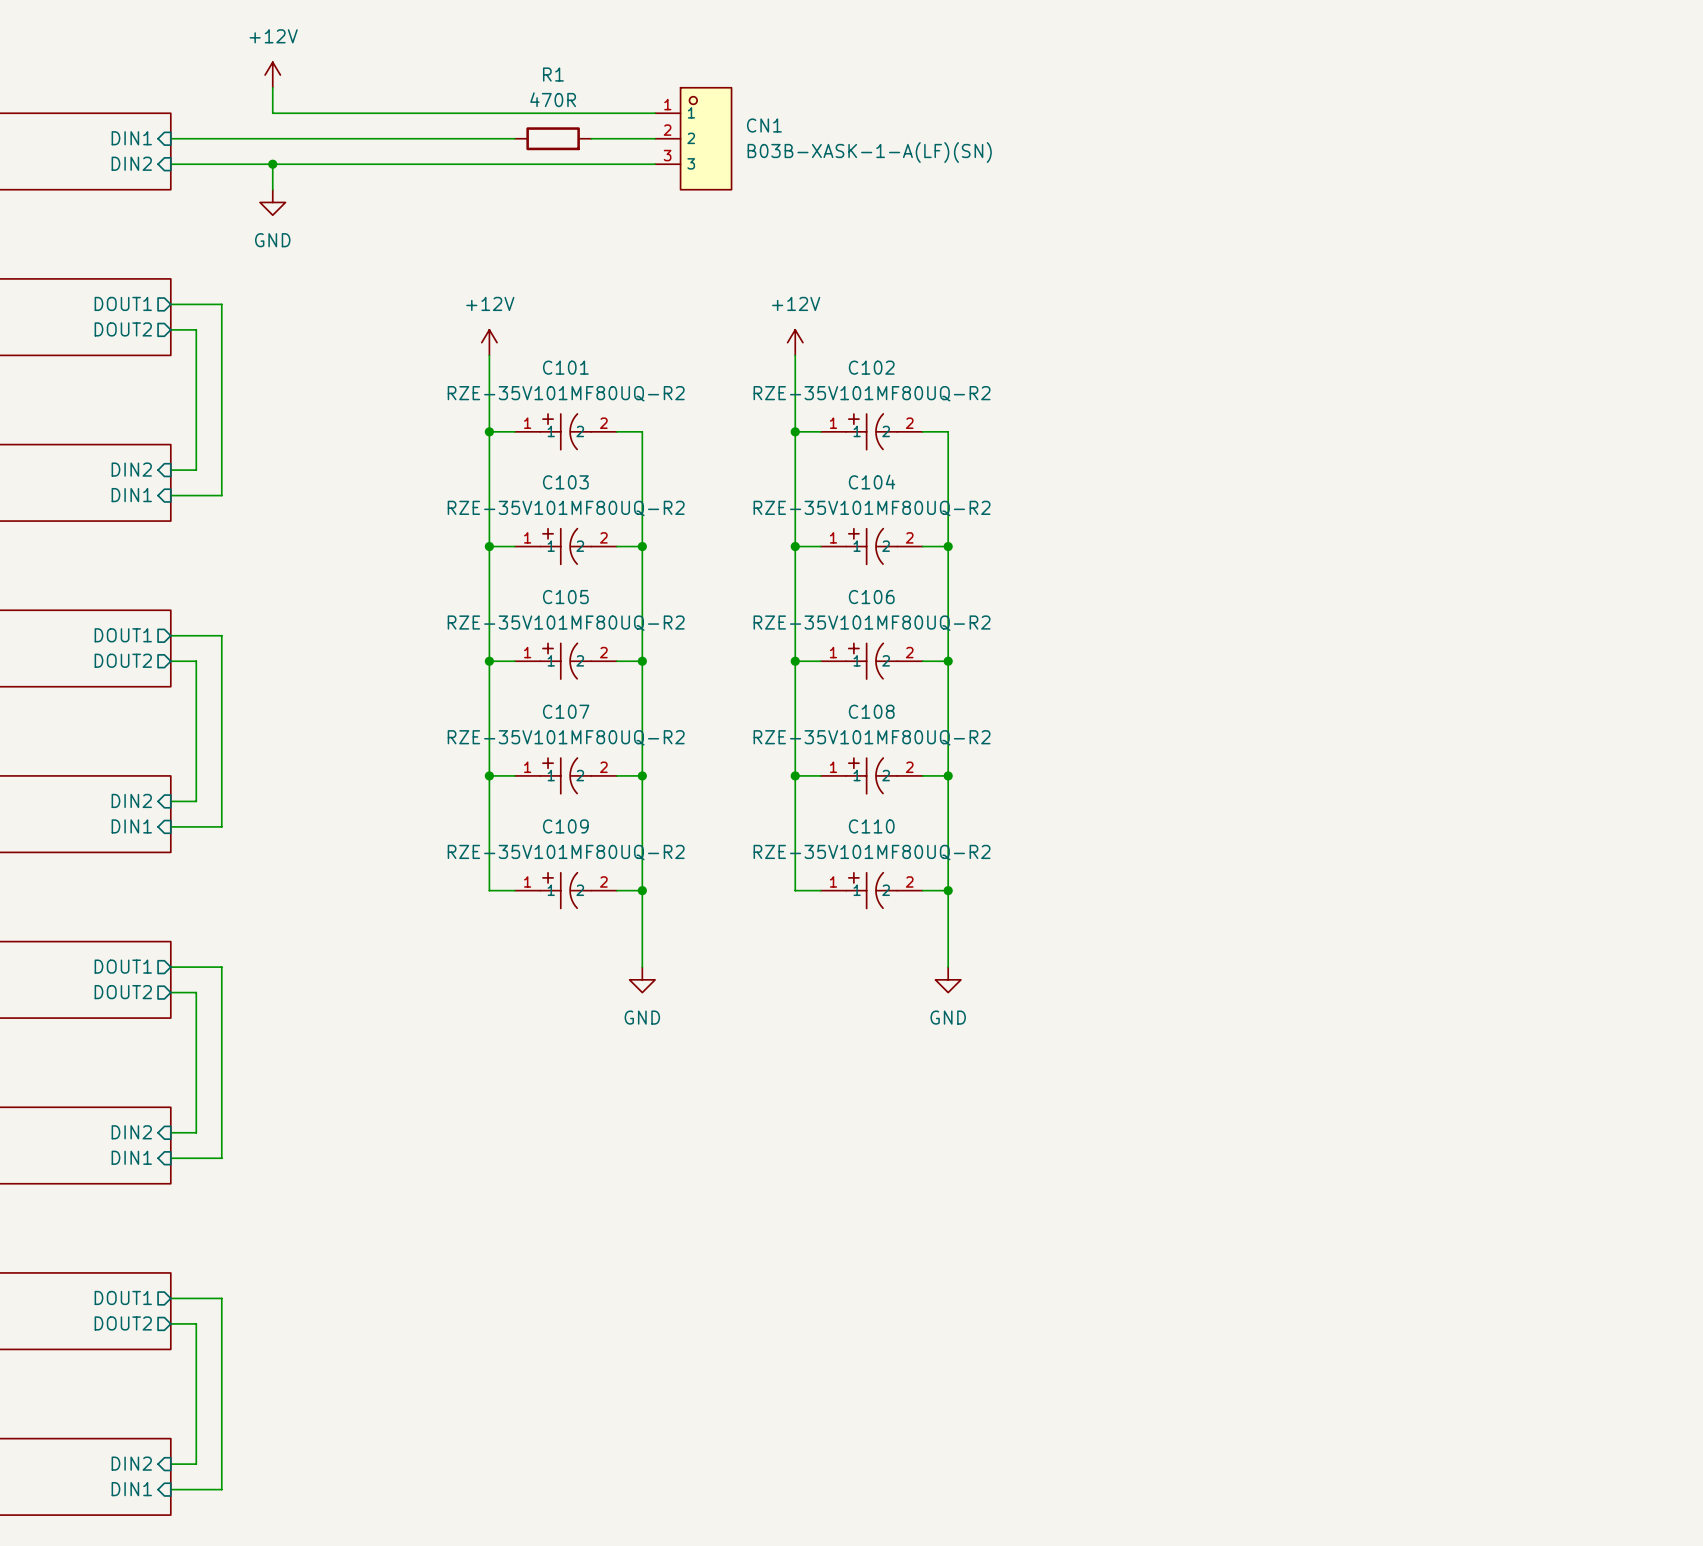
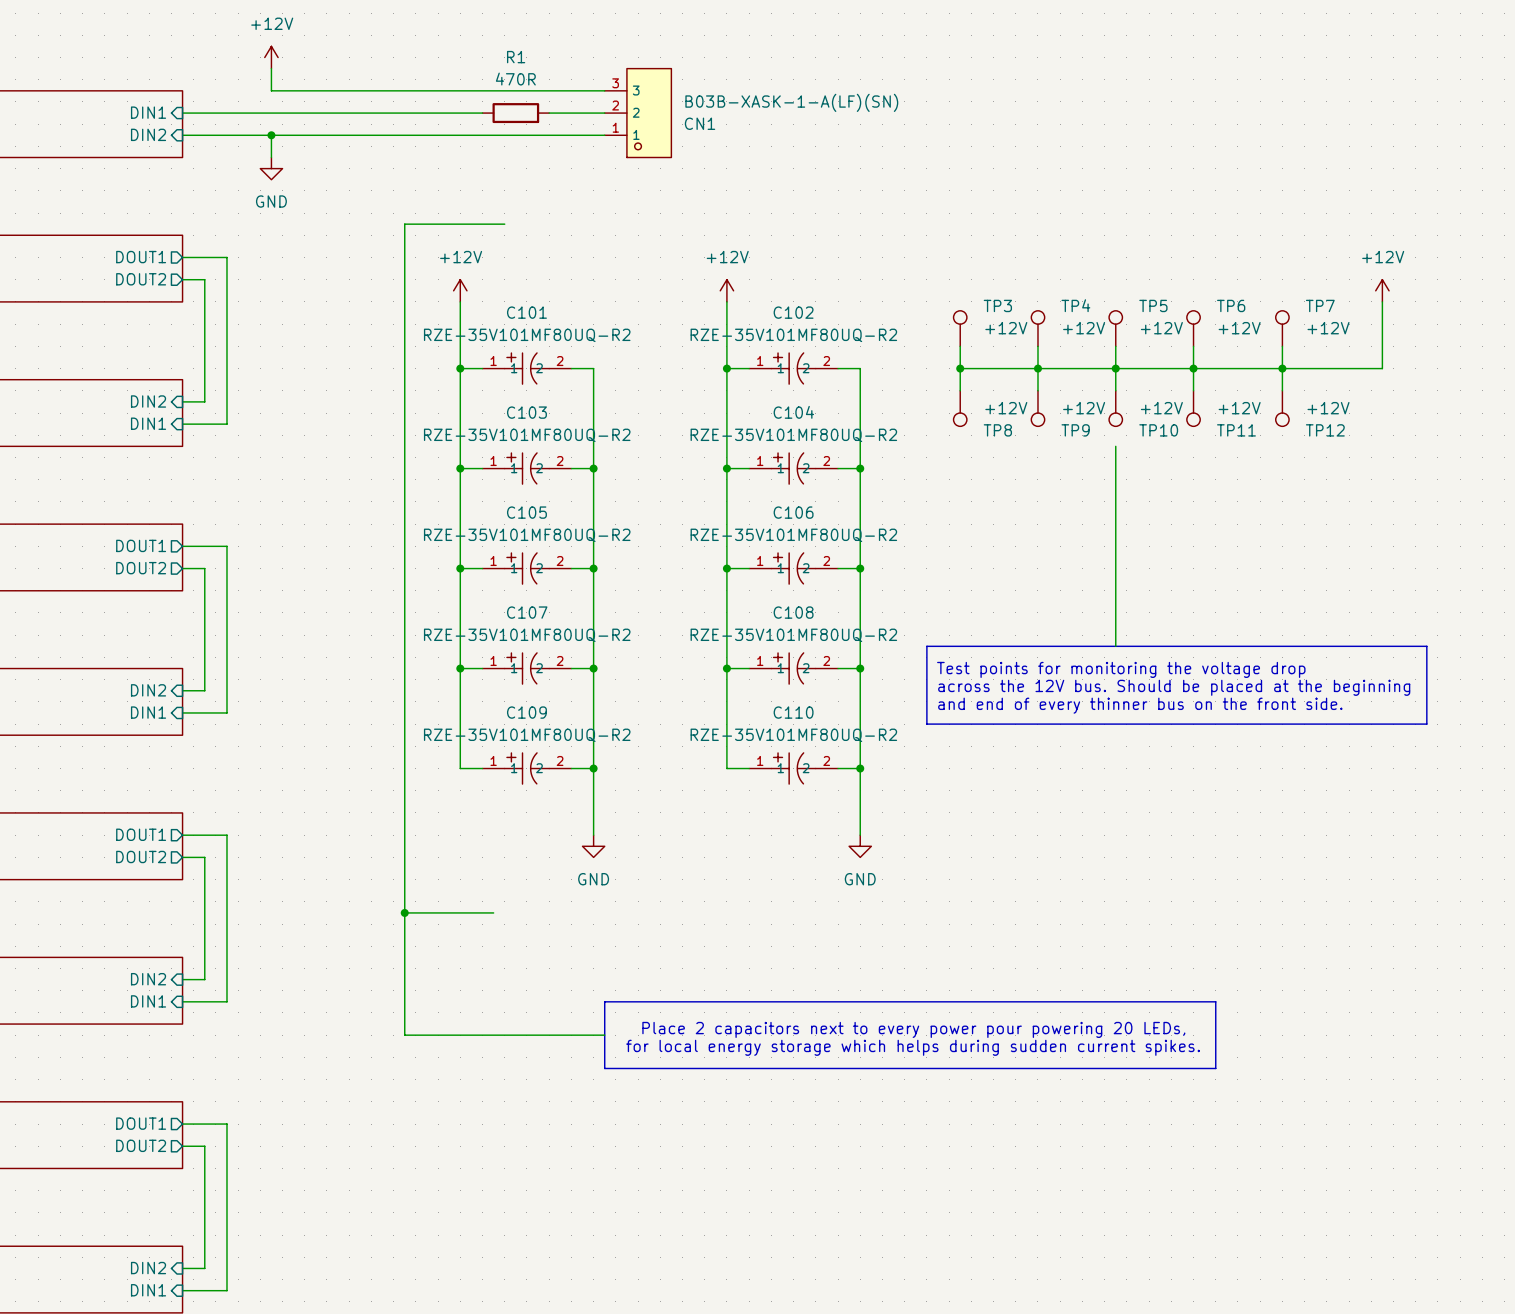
CN1 flip: as is (706, 138) -> up-down (649, 113)
wire: none -> (504, 224) (404, 224) (404, 1035) (604, 1035)
power symbol: none -> +12V (1382, 290)
wire: none -> (1382, 301) (1382, 368) (960, 368)
TP3: none -> +12V (960, 328)
TP4: none -> +12V (1037, 328)
TP5: none -> +12V (1115, 328)
TP6: none -> +12V (1193, 328)
TP7: none -> +12V (1282, 328)
wire: none -> (960, 346) (960, 390)
wire: none -> (1037, 346) (1037, 390)
wire: none -> (1115, 346) (1115, 390)
wire: none -> (1193, 346) (1193, 390)
wire: none -> (1282, 346) (1282, 390)
junction: none -> (960, 368)
junction: none -> (1037, 368)
junction: none -> (1115, 368)
junction: none -> (1193, 368)
junction: none -> (1282, 368)
TP8: none -> +12V (960, 408)
TP9: none -> +12V (1037, 408)
TP10: none -> +12V (1115, 408)
TP11: none -> +12V (1193, 408)
TP12: none -> +12V (1282, 408)
wire: none -> (1115, 446) (1115, 646)
line: none -> (926, 646) (1426, 646) (1426, 724) (926, 724) (926, 646)
text: none -> Test points for monitoring the voltage drop (1121, 669)
text: none -> across the 12V bus. Should be placed at the beginning (1174, 687)
text: none -> and end of every thinner bus on the front side. (1140, 705)
wire: none -> (404, 912) (493, 912)
junction: none -> (404, 912)
line: none -> (604, 1001) (1215, 1001) (1215, 1068) (604, 1068) (604, 1001)
text: none -> Place 2 capacitors next to every power pour powering 20 LEDs, (913, 1029)
text: none -> for local energy storage which helps during sudden current spikes. (913, 1047)

